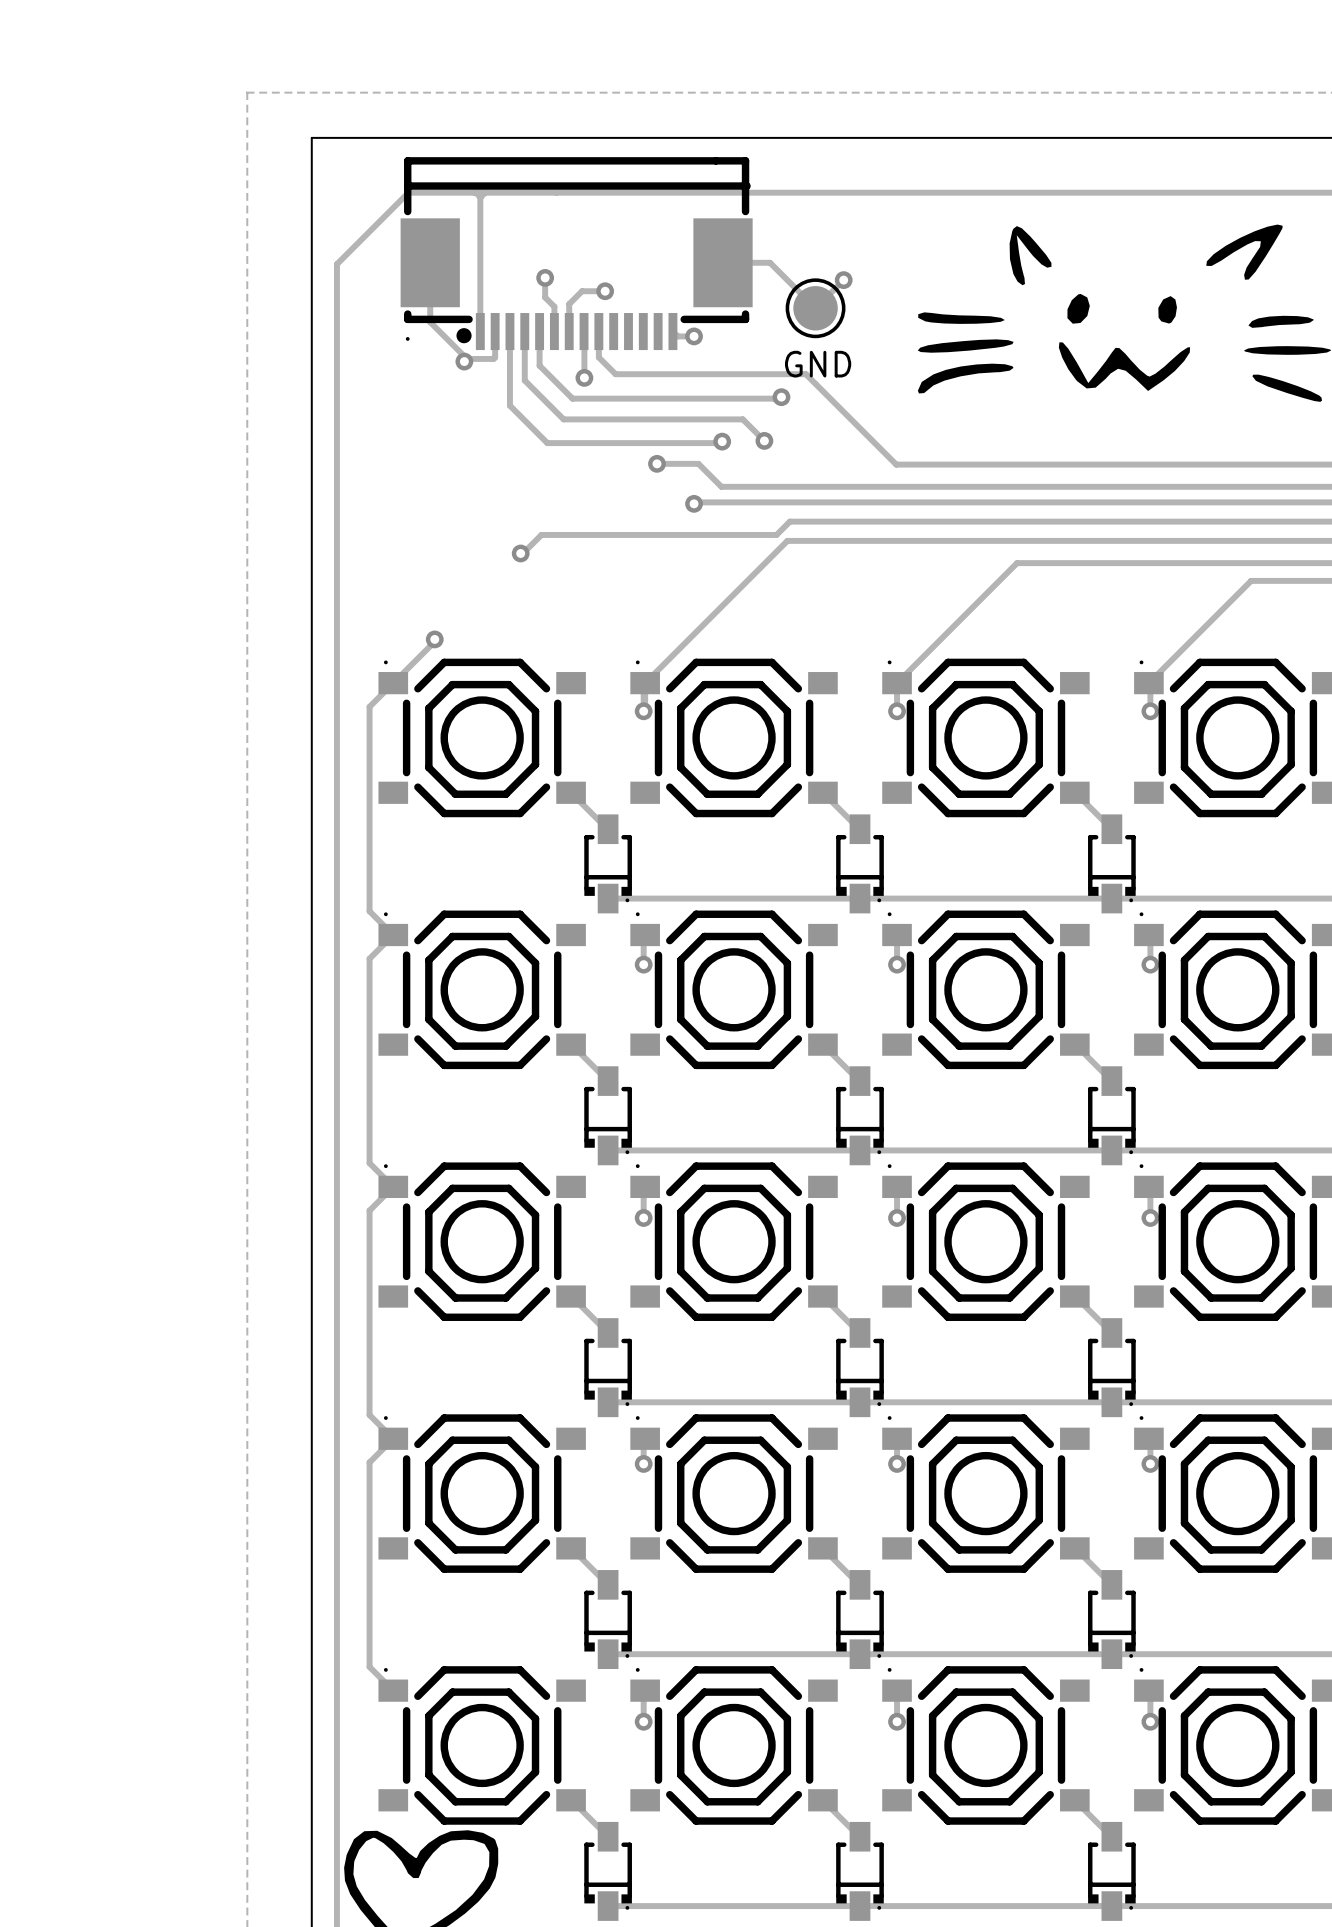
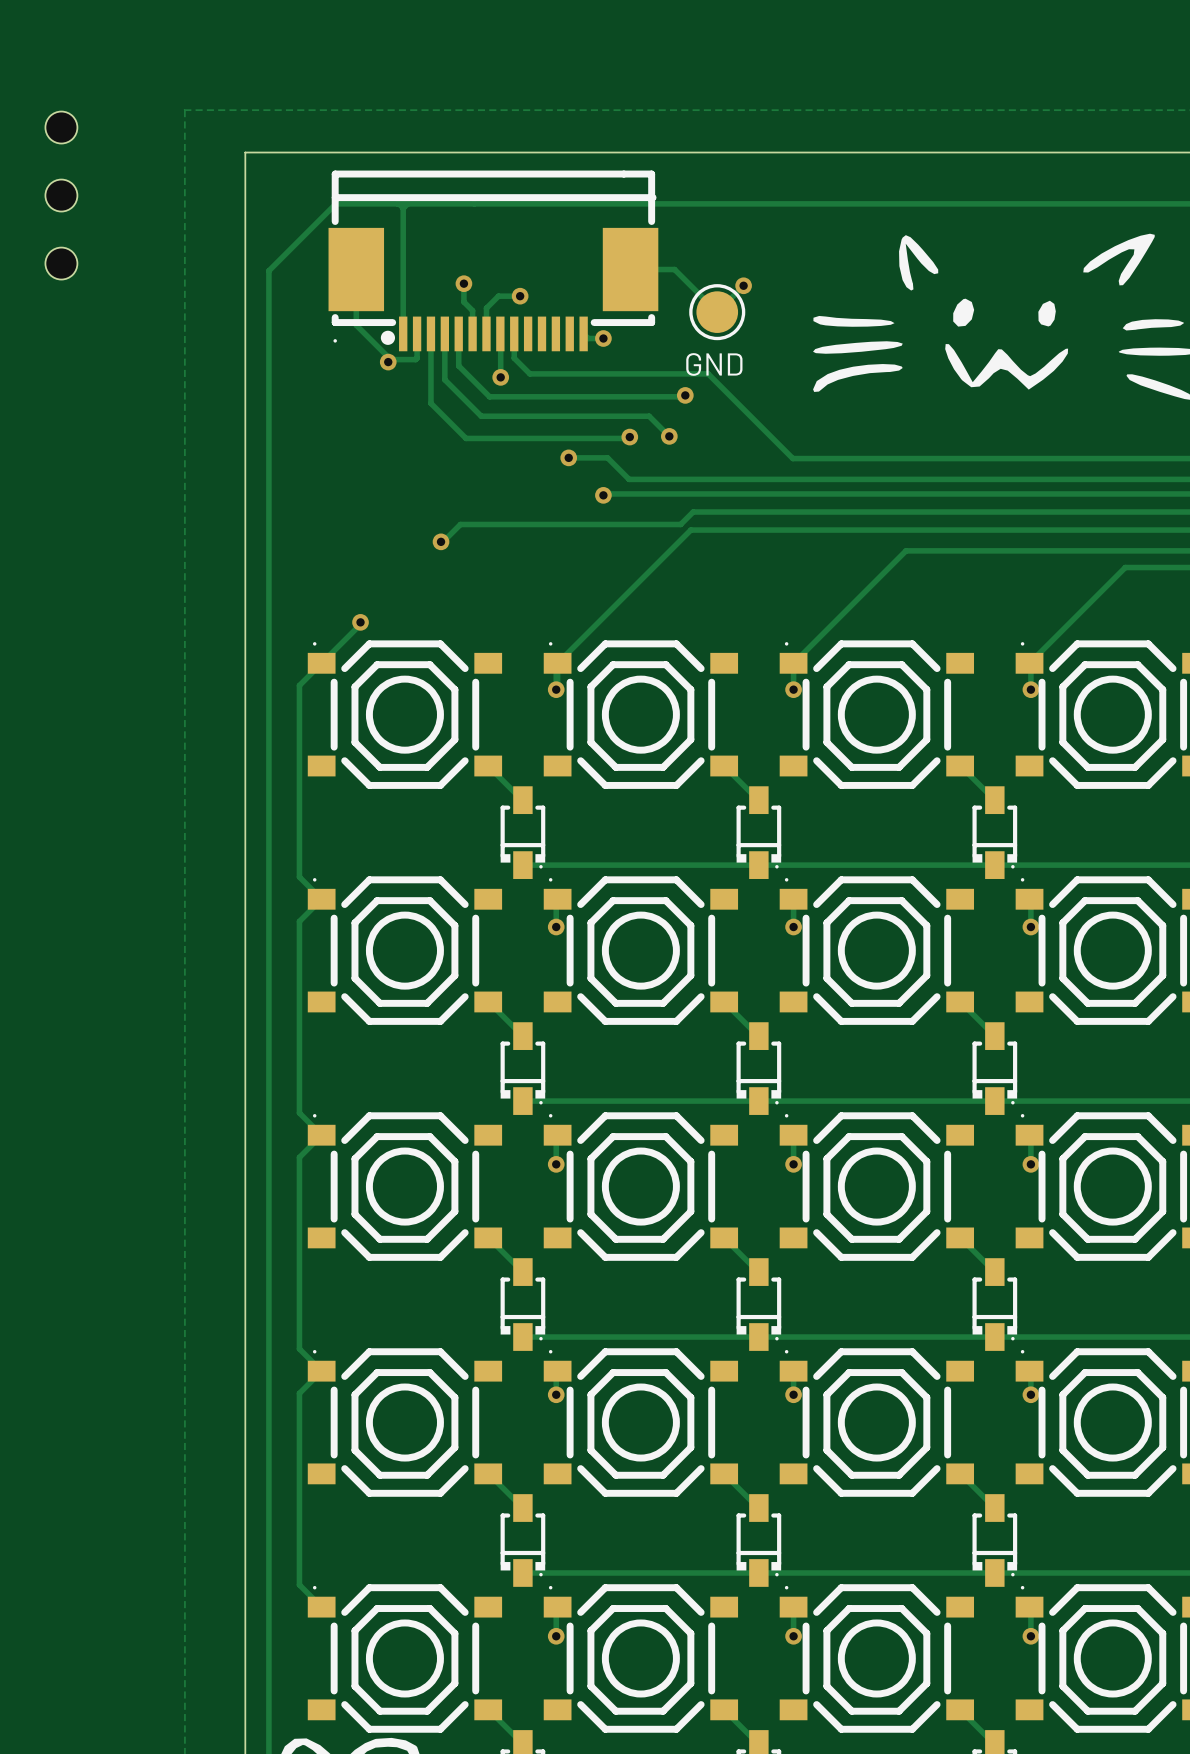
part: none -> (61, 127)
part: none -> (61, 195)
part: none -> (61, 263)

